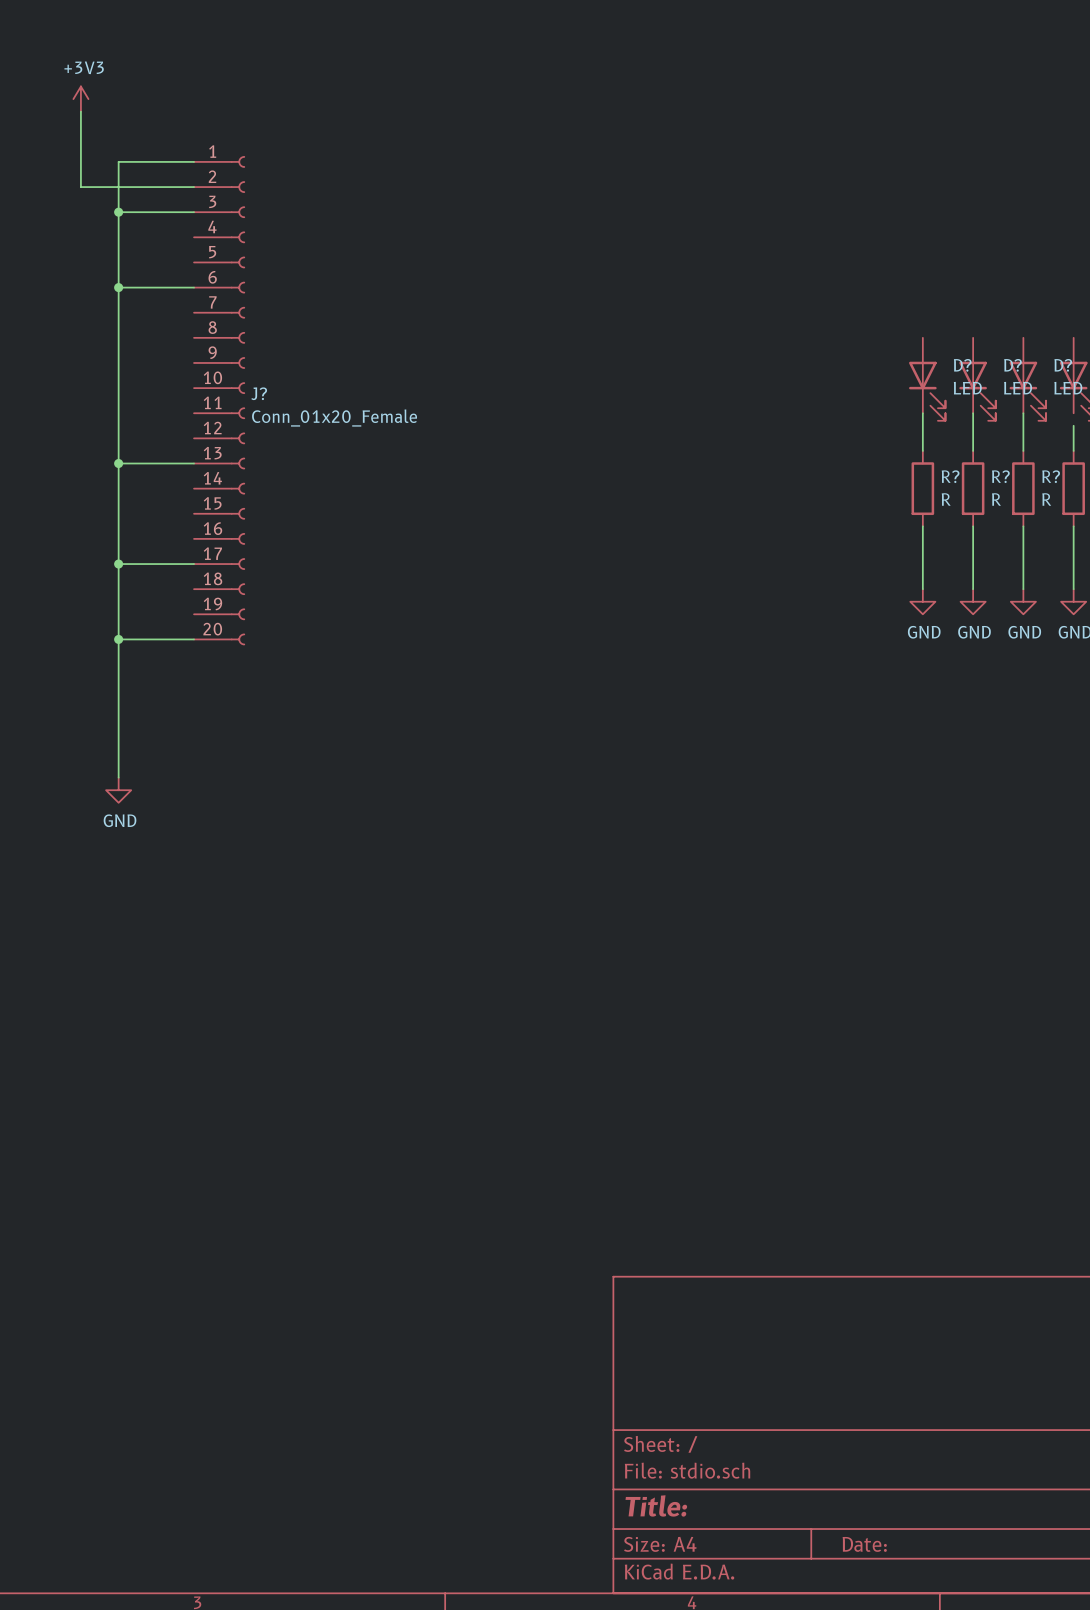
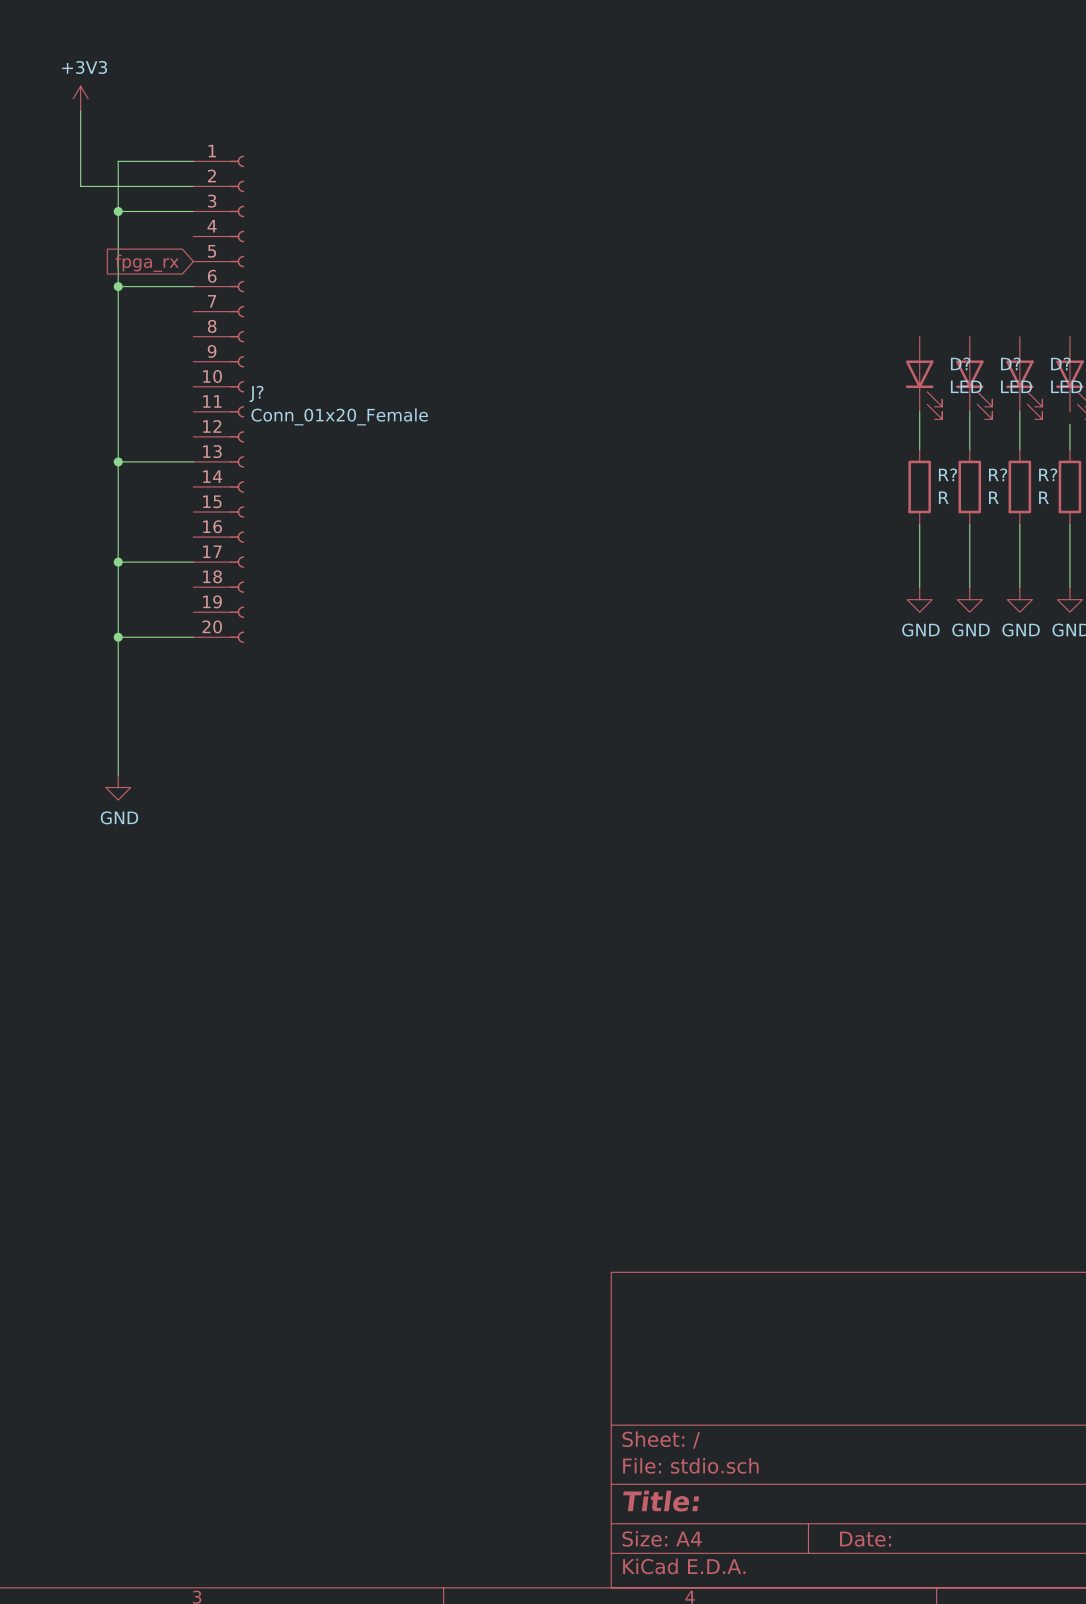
global label: none -> fpga_rx (147, 263)

